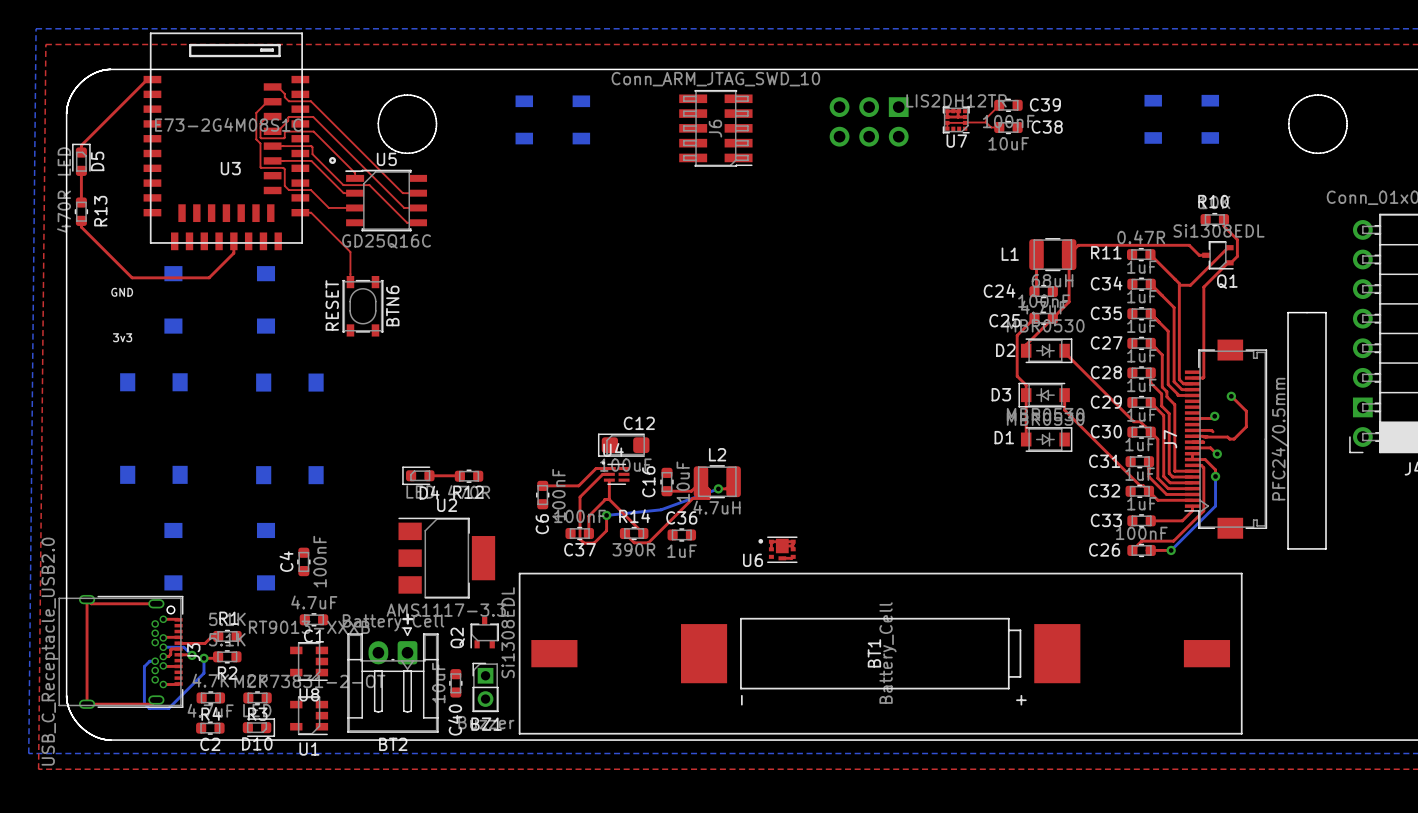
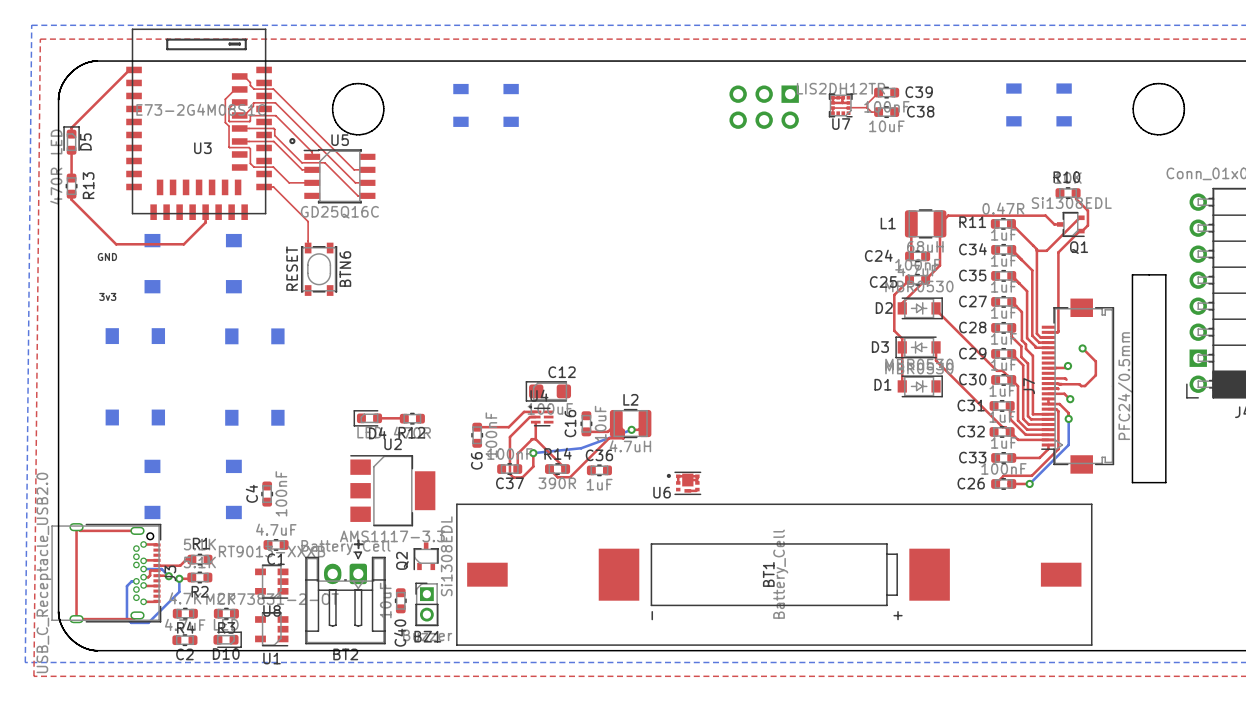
J6: Conn_ARM_JTAG_SWD_10 (715, 128) -> none

